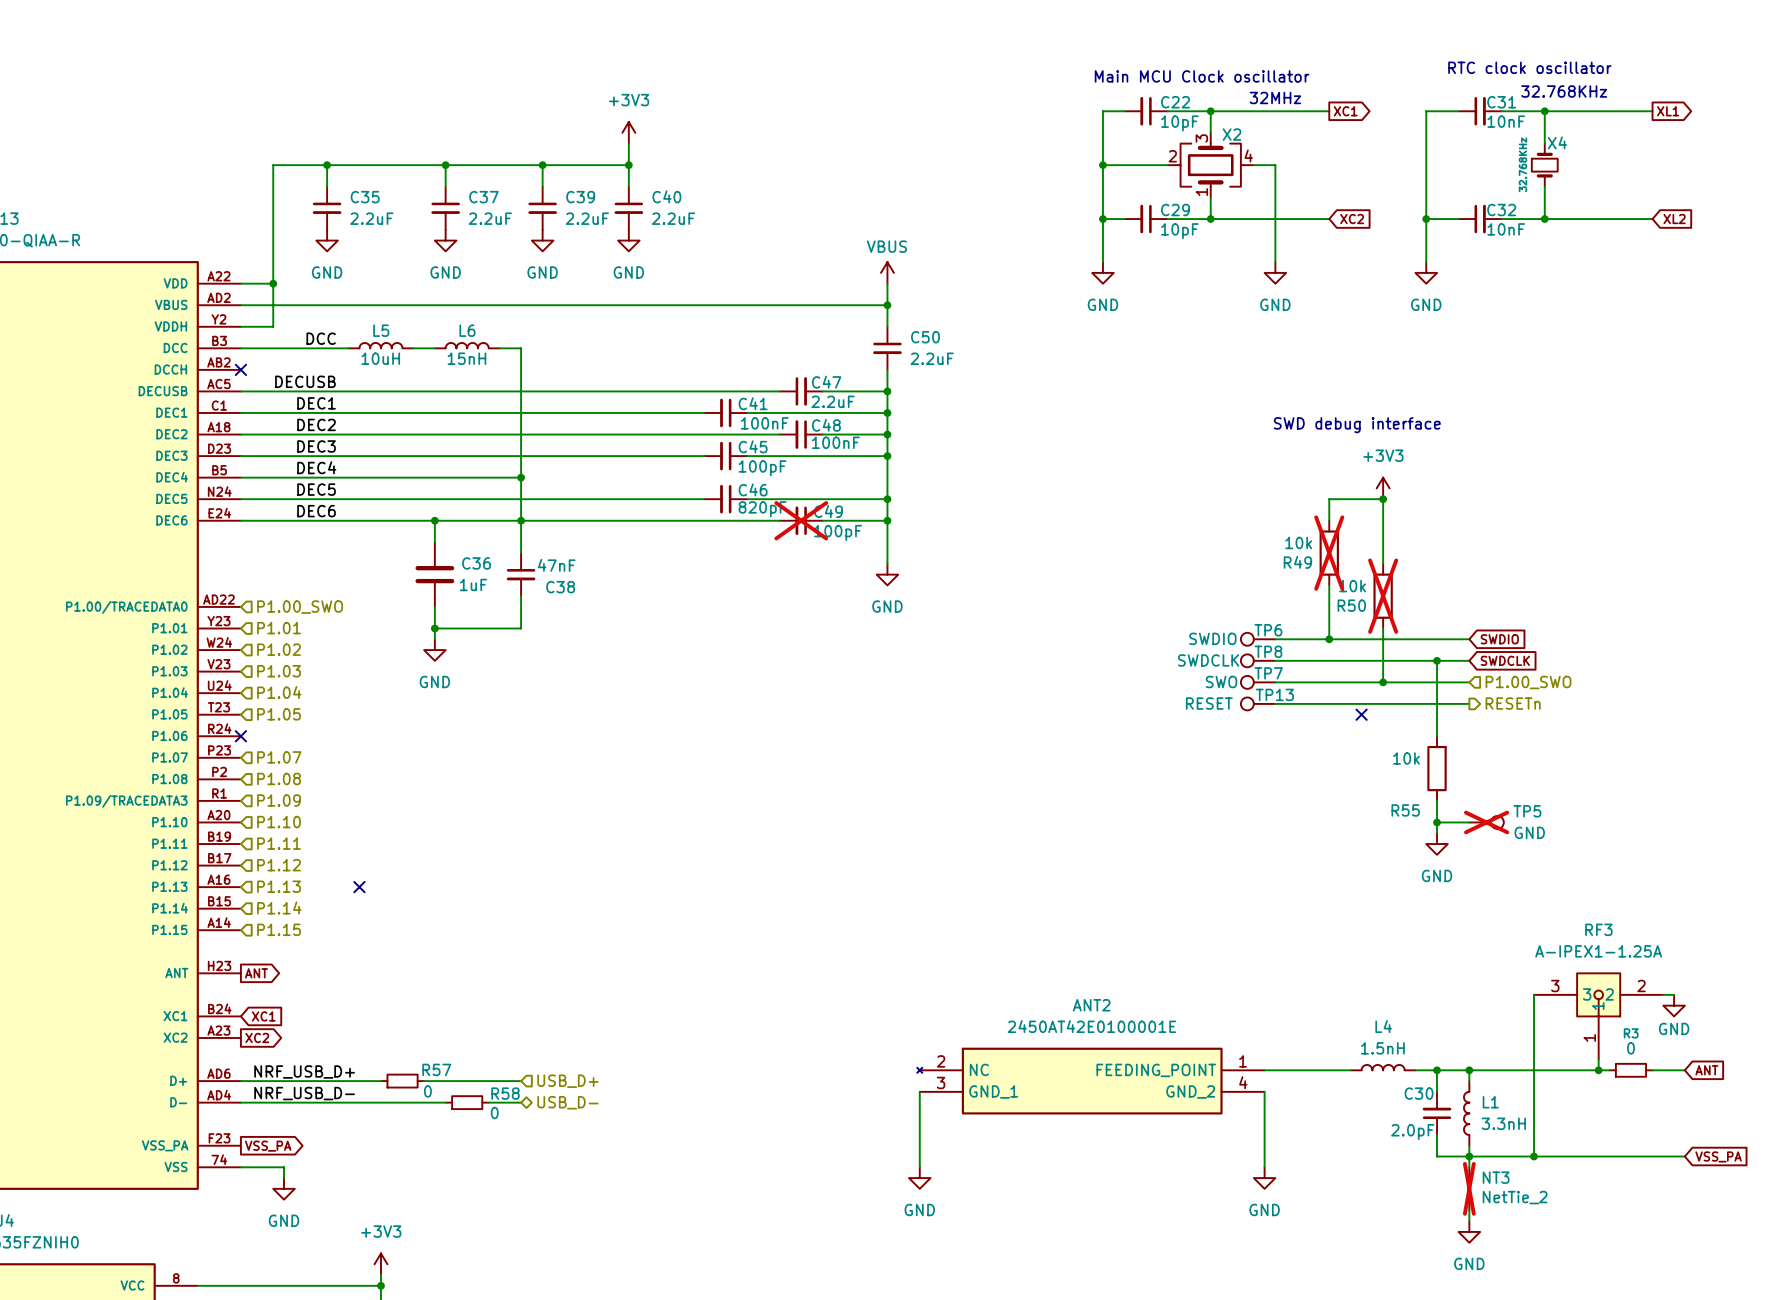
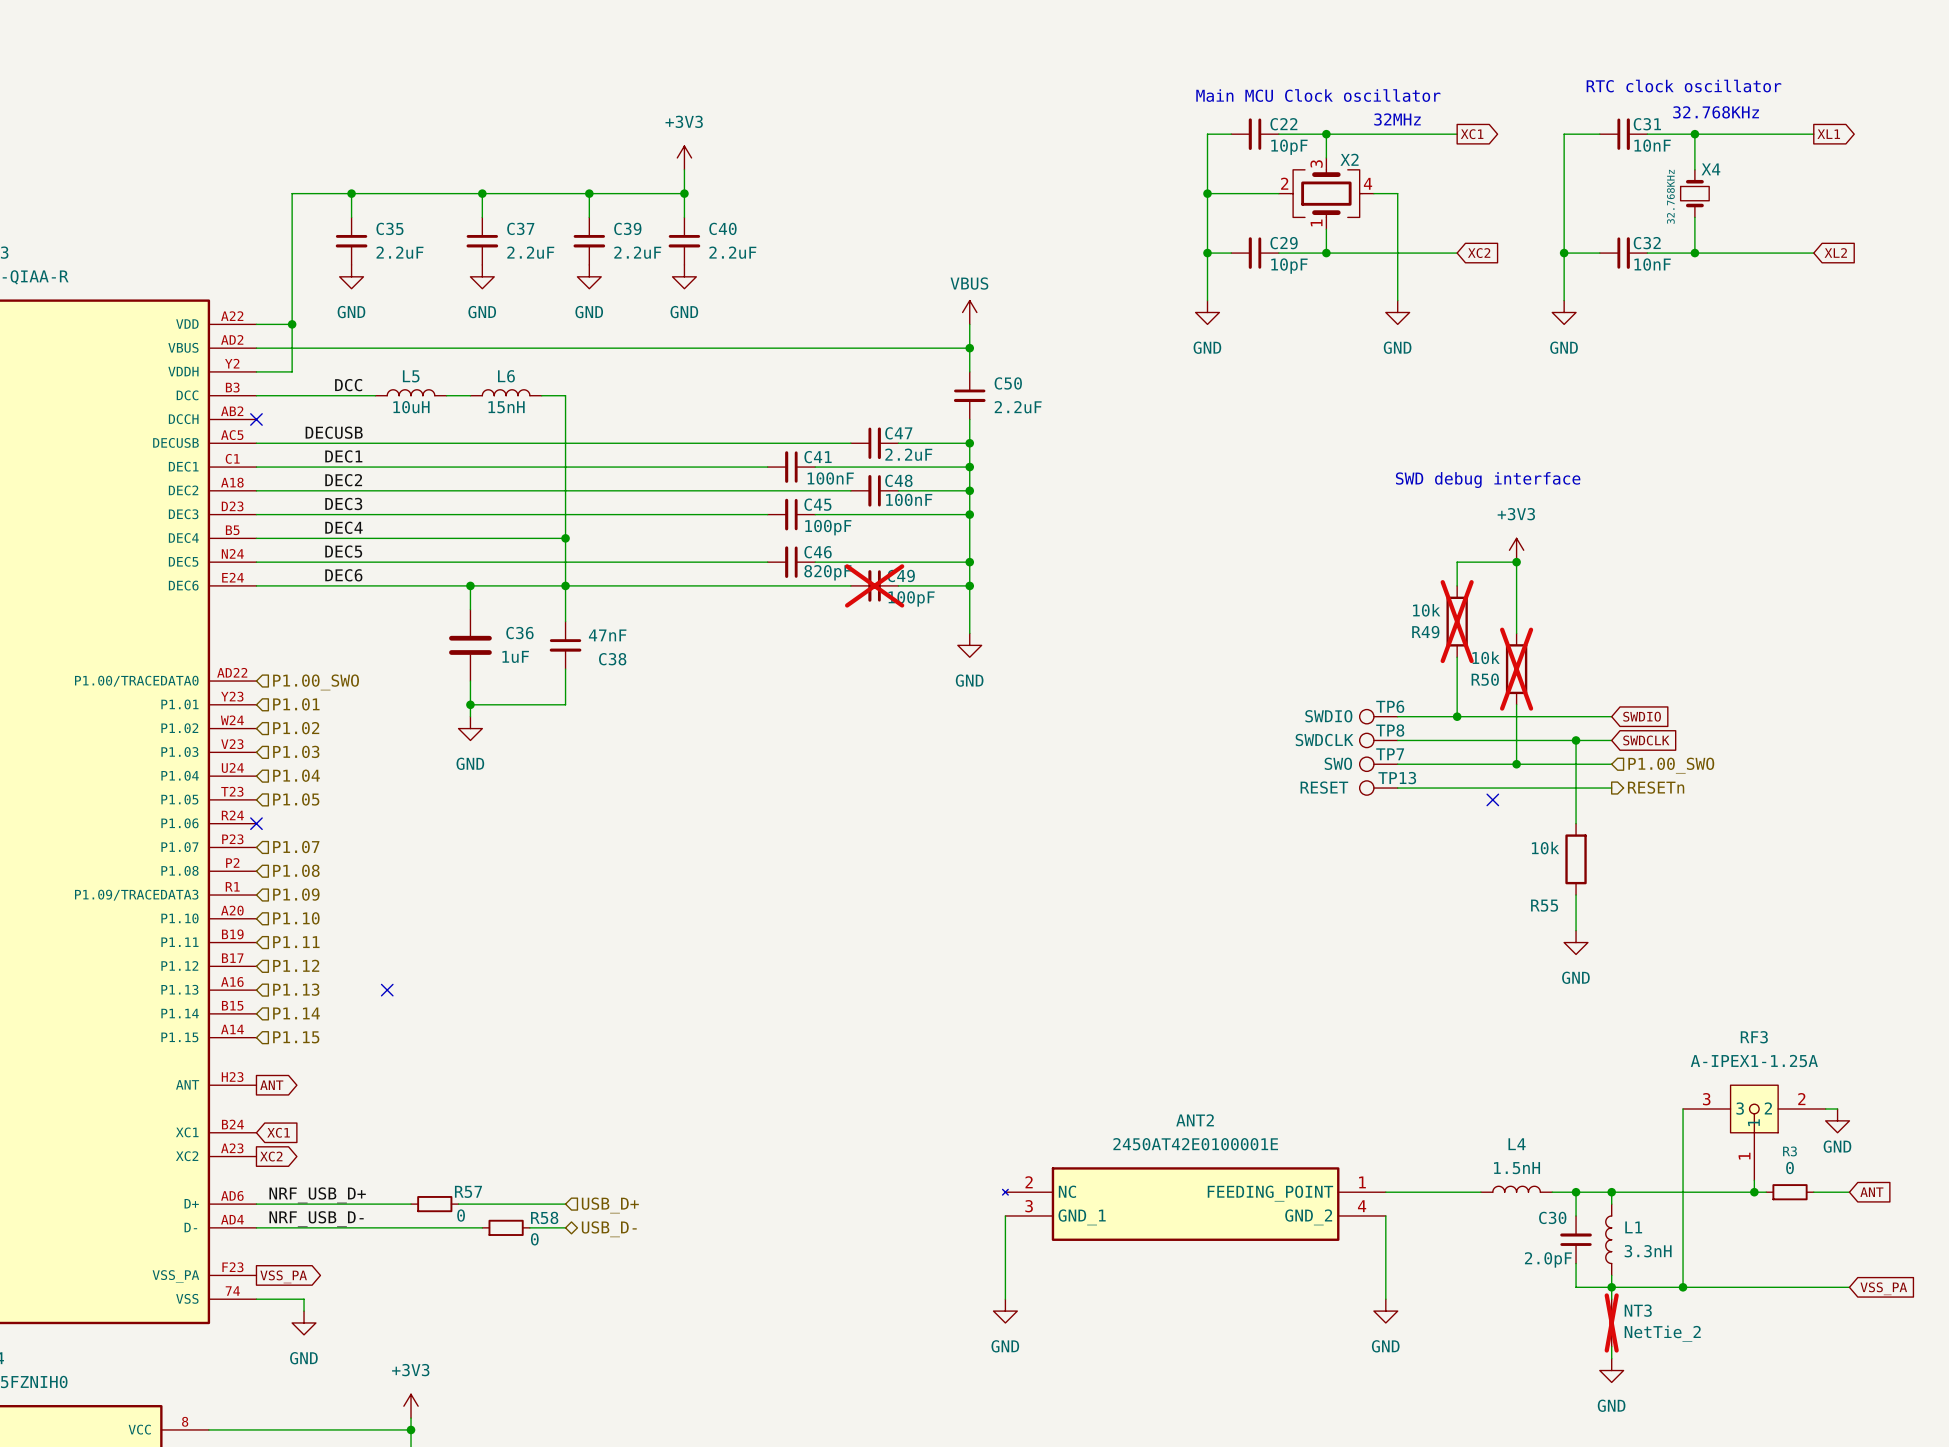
wire: (1437, 822) (1469, 822) -> none
junction: (1437, 822) -> none
TP5: GND (1486, 822) -> none

